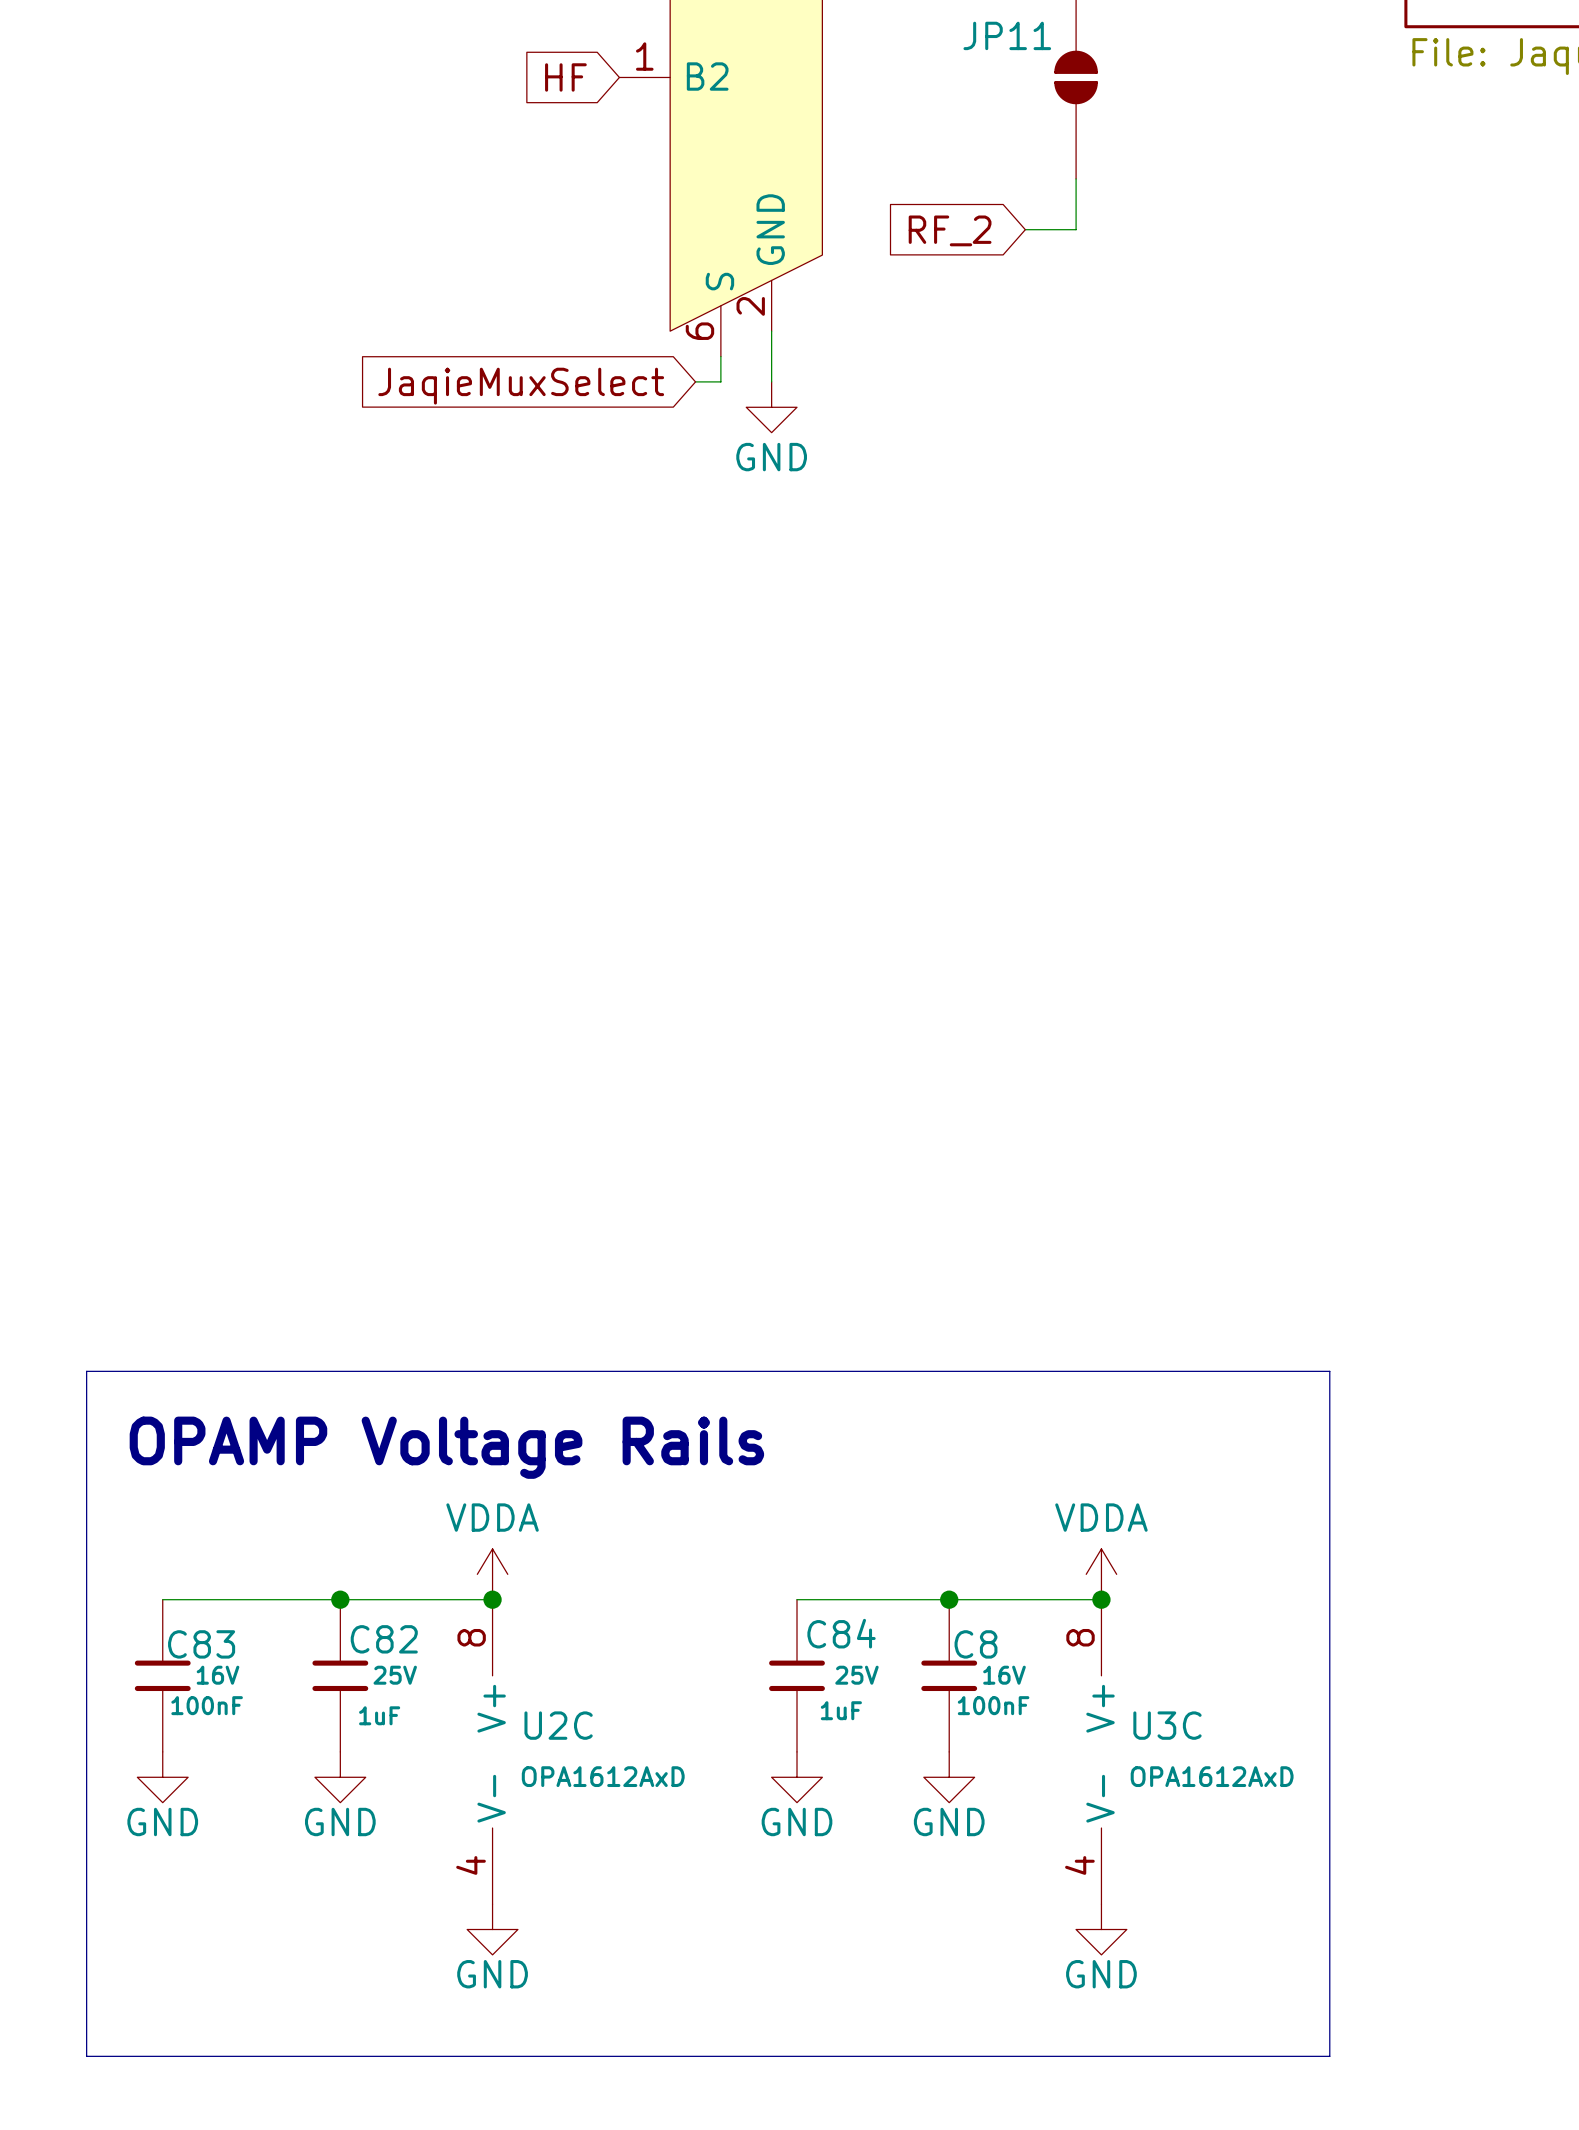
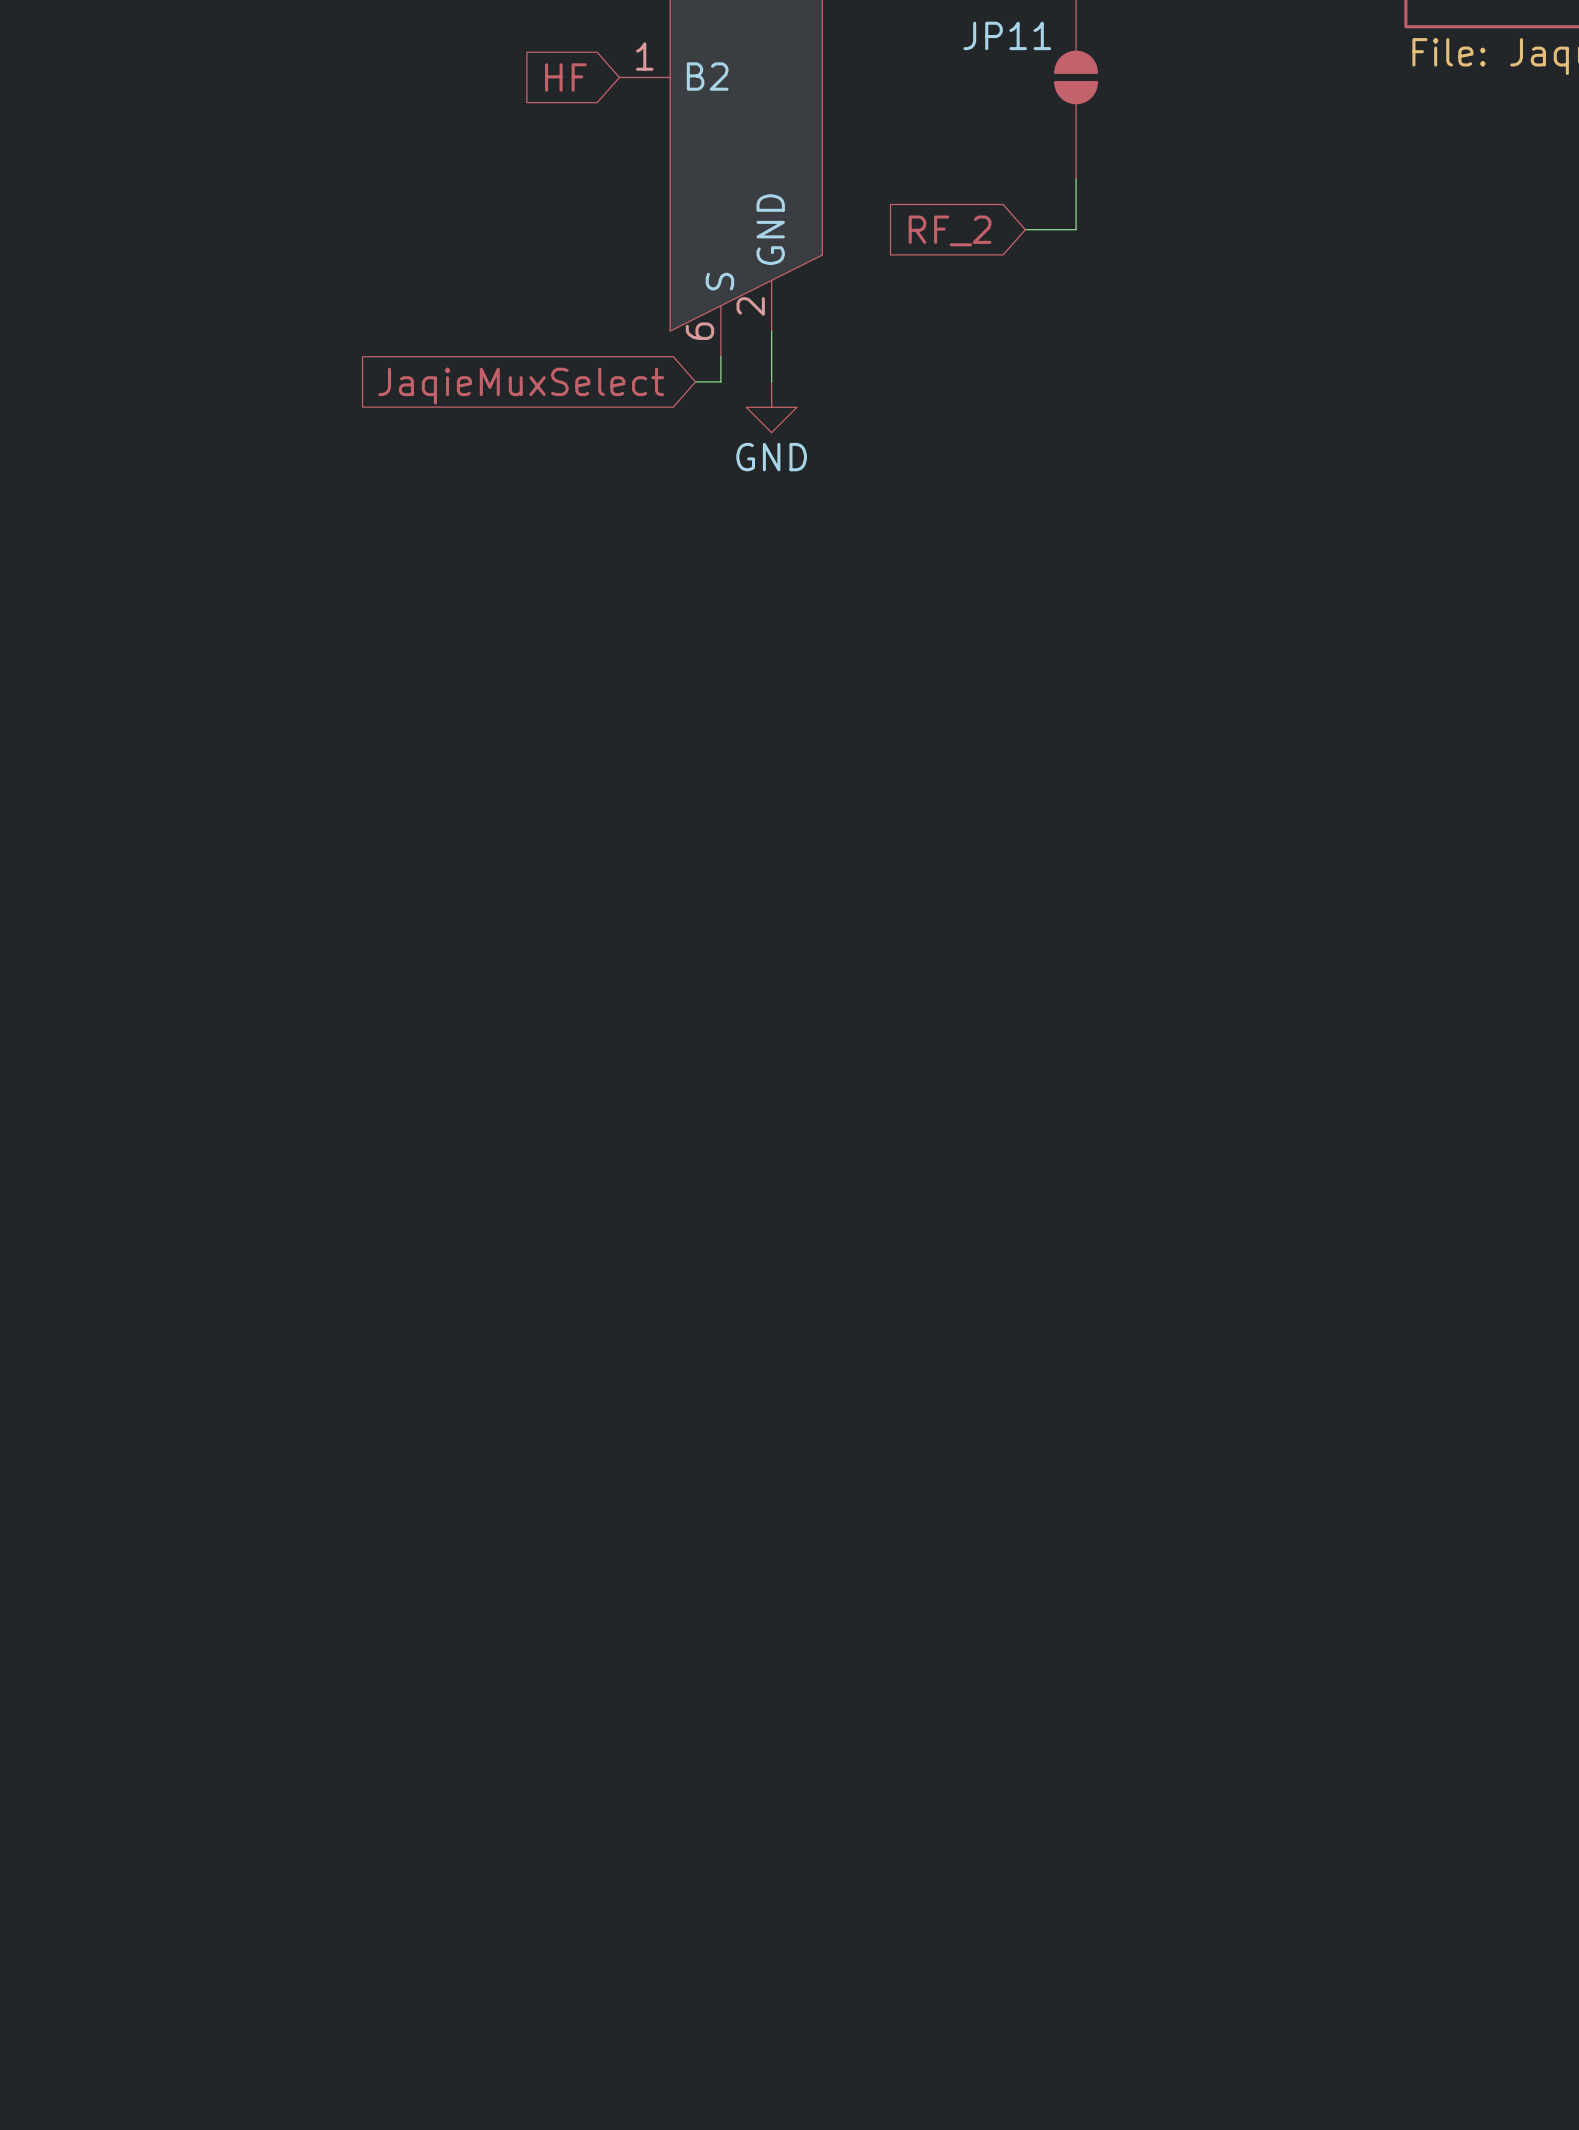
line: (86, 1371) (1329, 1371) (1329, 2056) (86, 2056) (86, 1371) -> none
text: OPAMP Voltage Rails (446, 1447) -> none
power symbol: VDDA (492, 1574) -> none
power symbol: VDDA (1101, 1574) -> none
wire: (162, 1599) (492, 1599) -> none
junction: (340, 1599) -> none
junction: (492, 1599) -> none
wire: (797, 1599) (1101, 1599) -> none
junction: (949, 1599) -> none
junction: (1101, 1599) -> none
C83: 100nF (162, 1675) -> none
C82: 1uF (340, 1675) -> none
C84: 1uF (797, 1675) -> none
C8: 100nF (949, 1675) -> none
U2C: OPA1612AxD (492, 1751) -> none
U3C: OPA1612AxD (1101, 1751) -> none
power symbol: GND (162, 1777) -> none
power symbol: GND (340, 1777) -> none
power symbol: GND (797, 1777) -> none
power symbol: GND (949, 1777) -> none
power symbol: GND (492, 1929) -> none
power symbol: GND (1101, 1929) -> none

